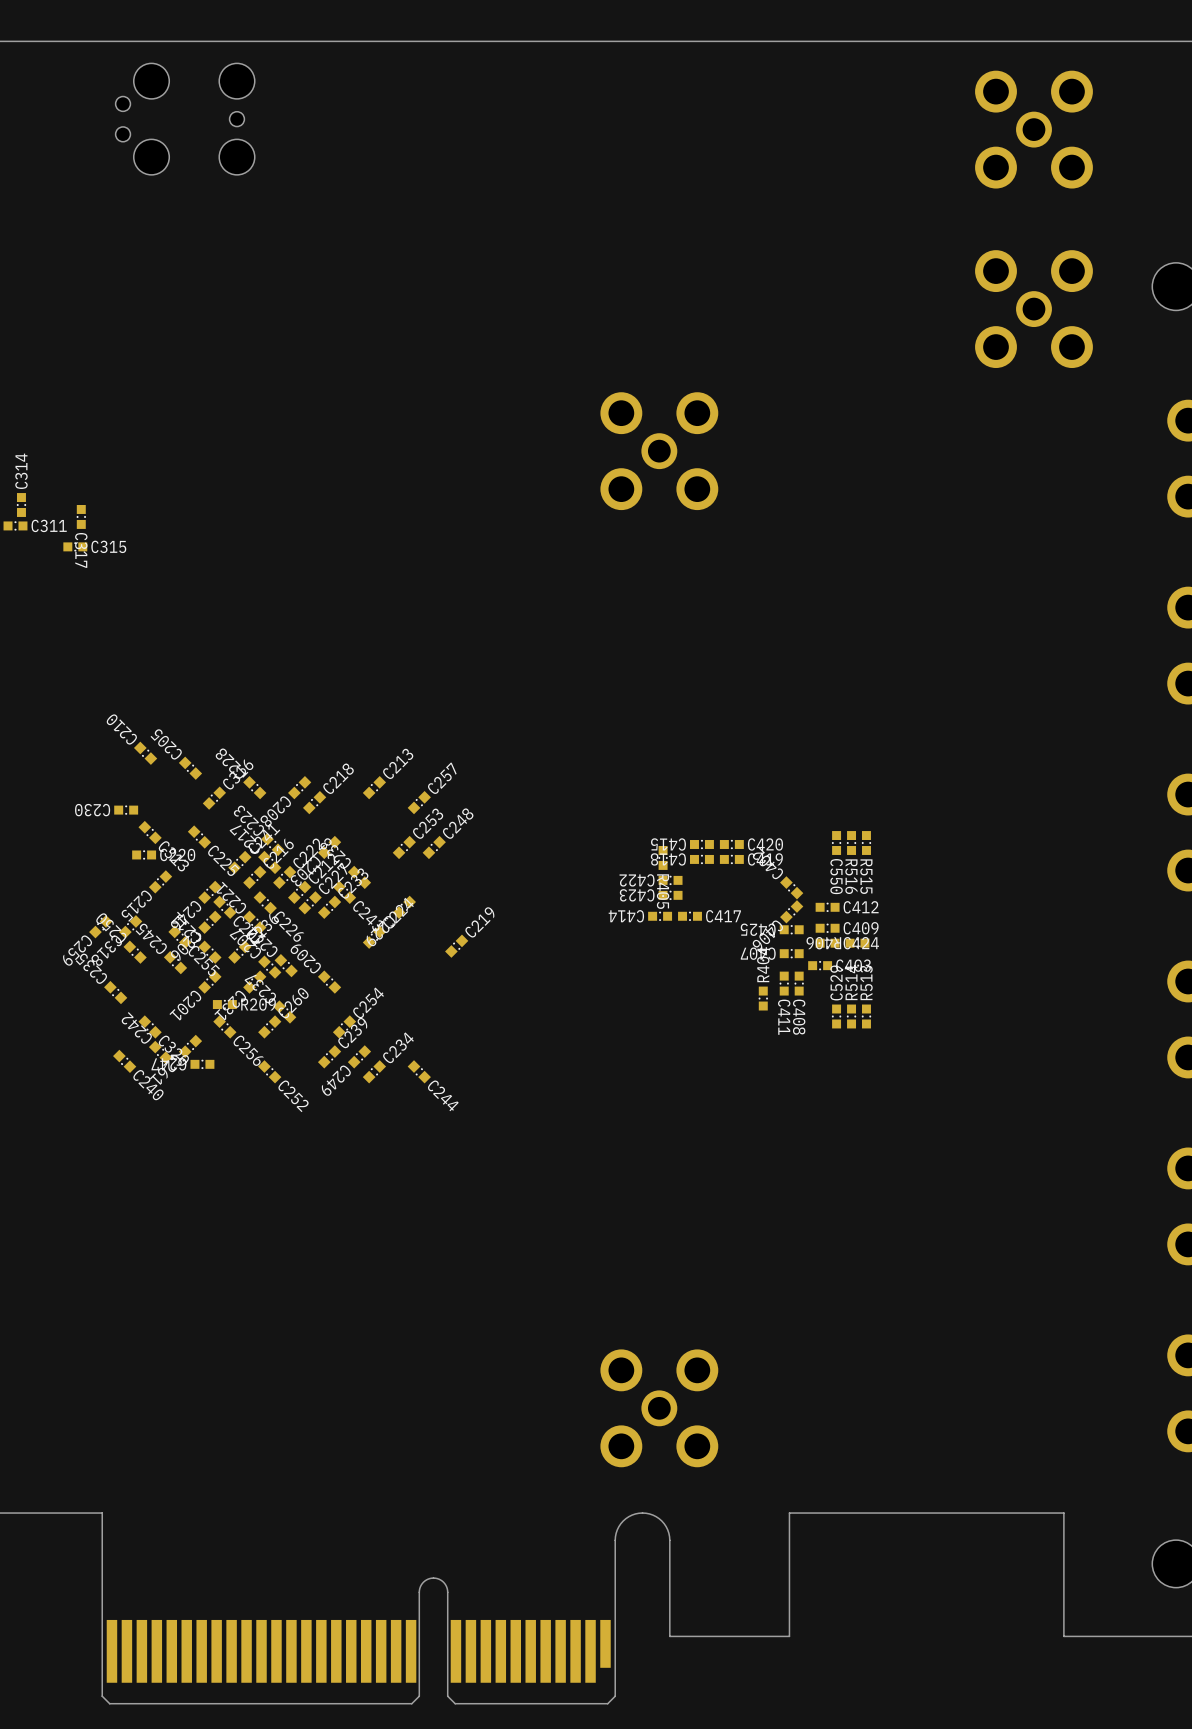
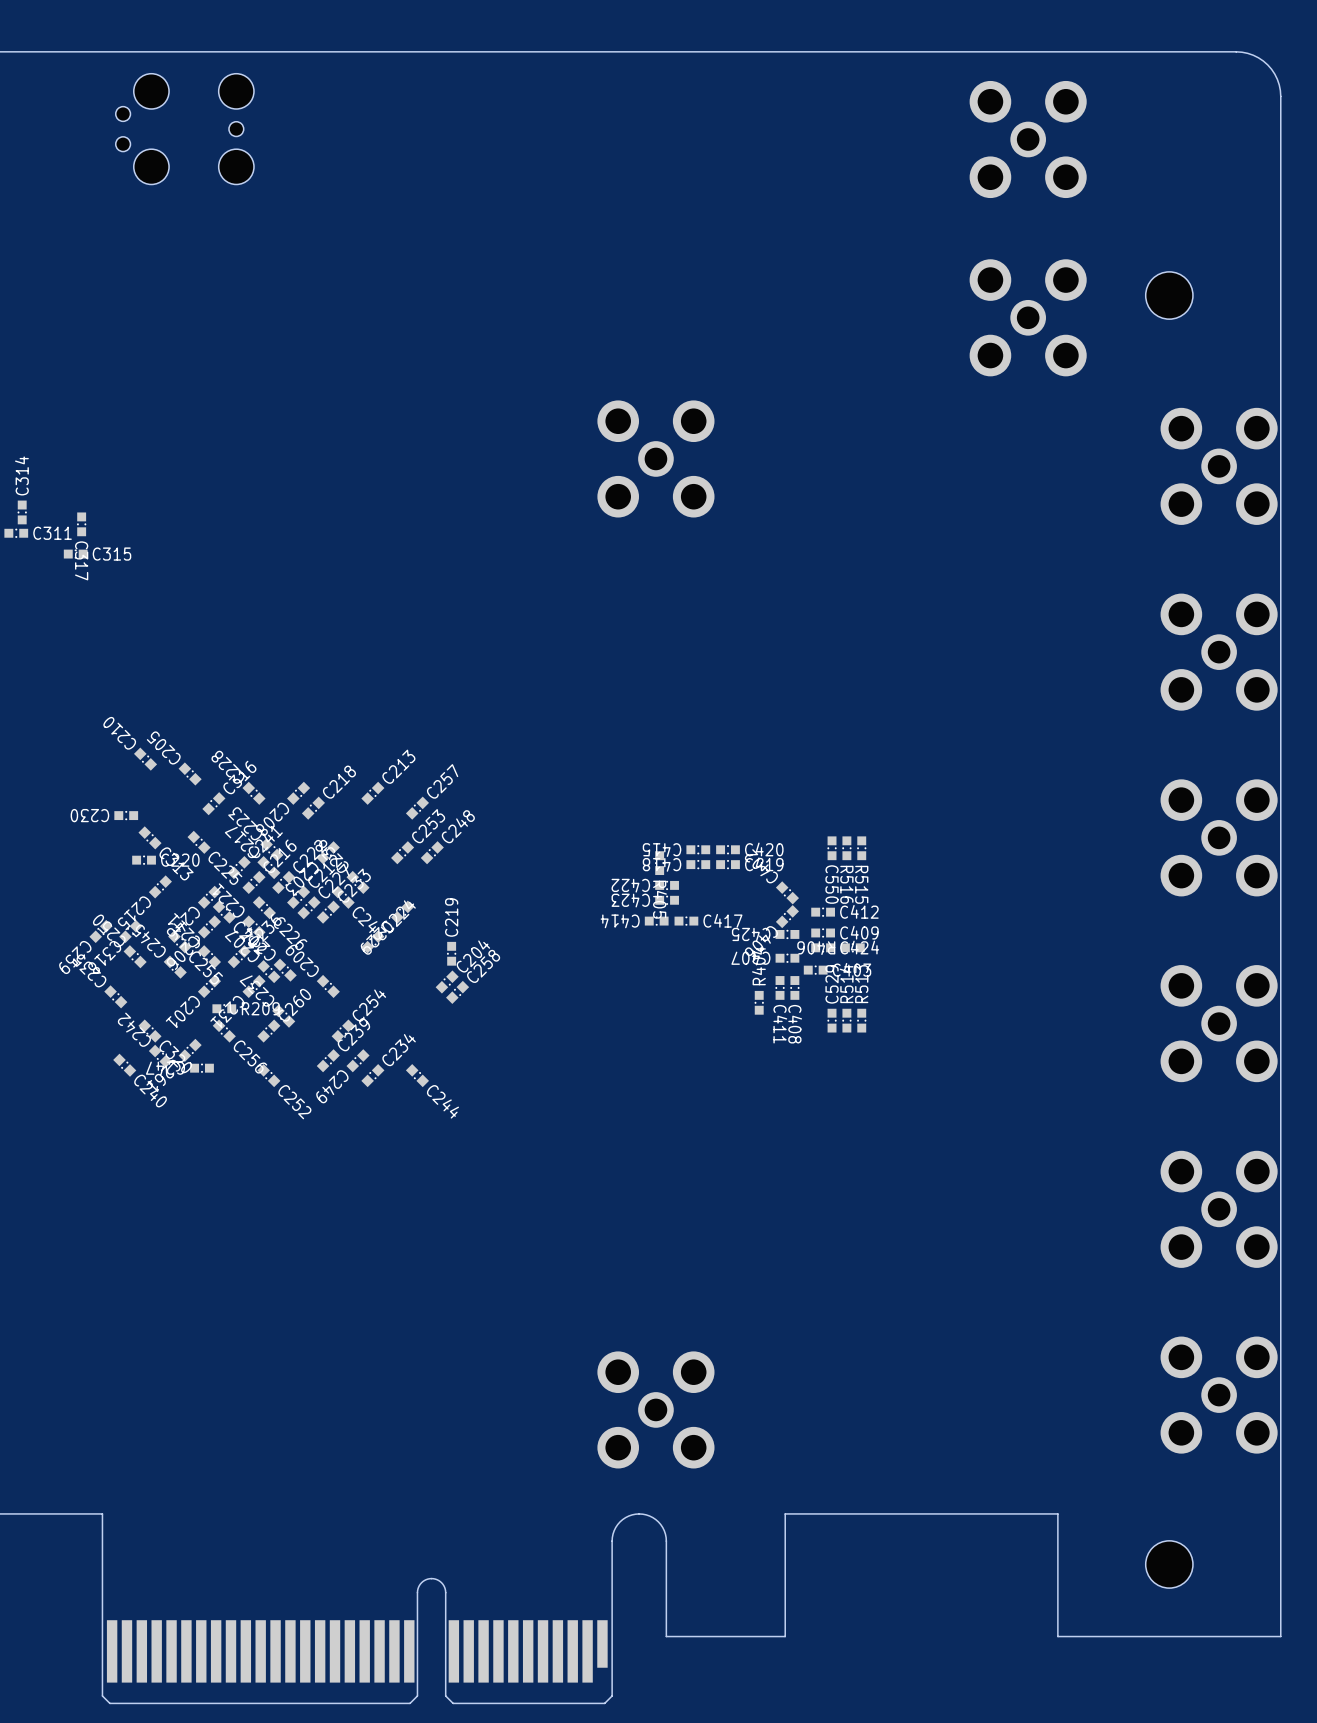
C219 rotation: 0° (456, 946) -> 45° counterclockwise (451, 953)
C204: none -> (447, 982)
C258: none -> (457, 992)

